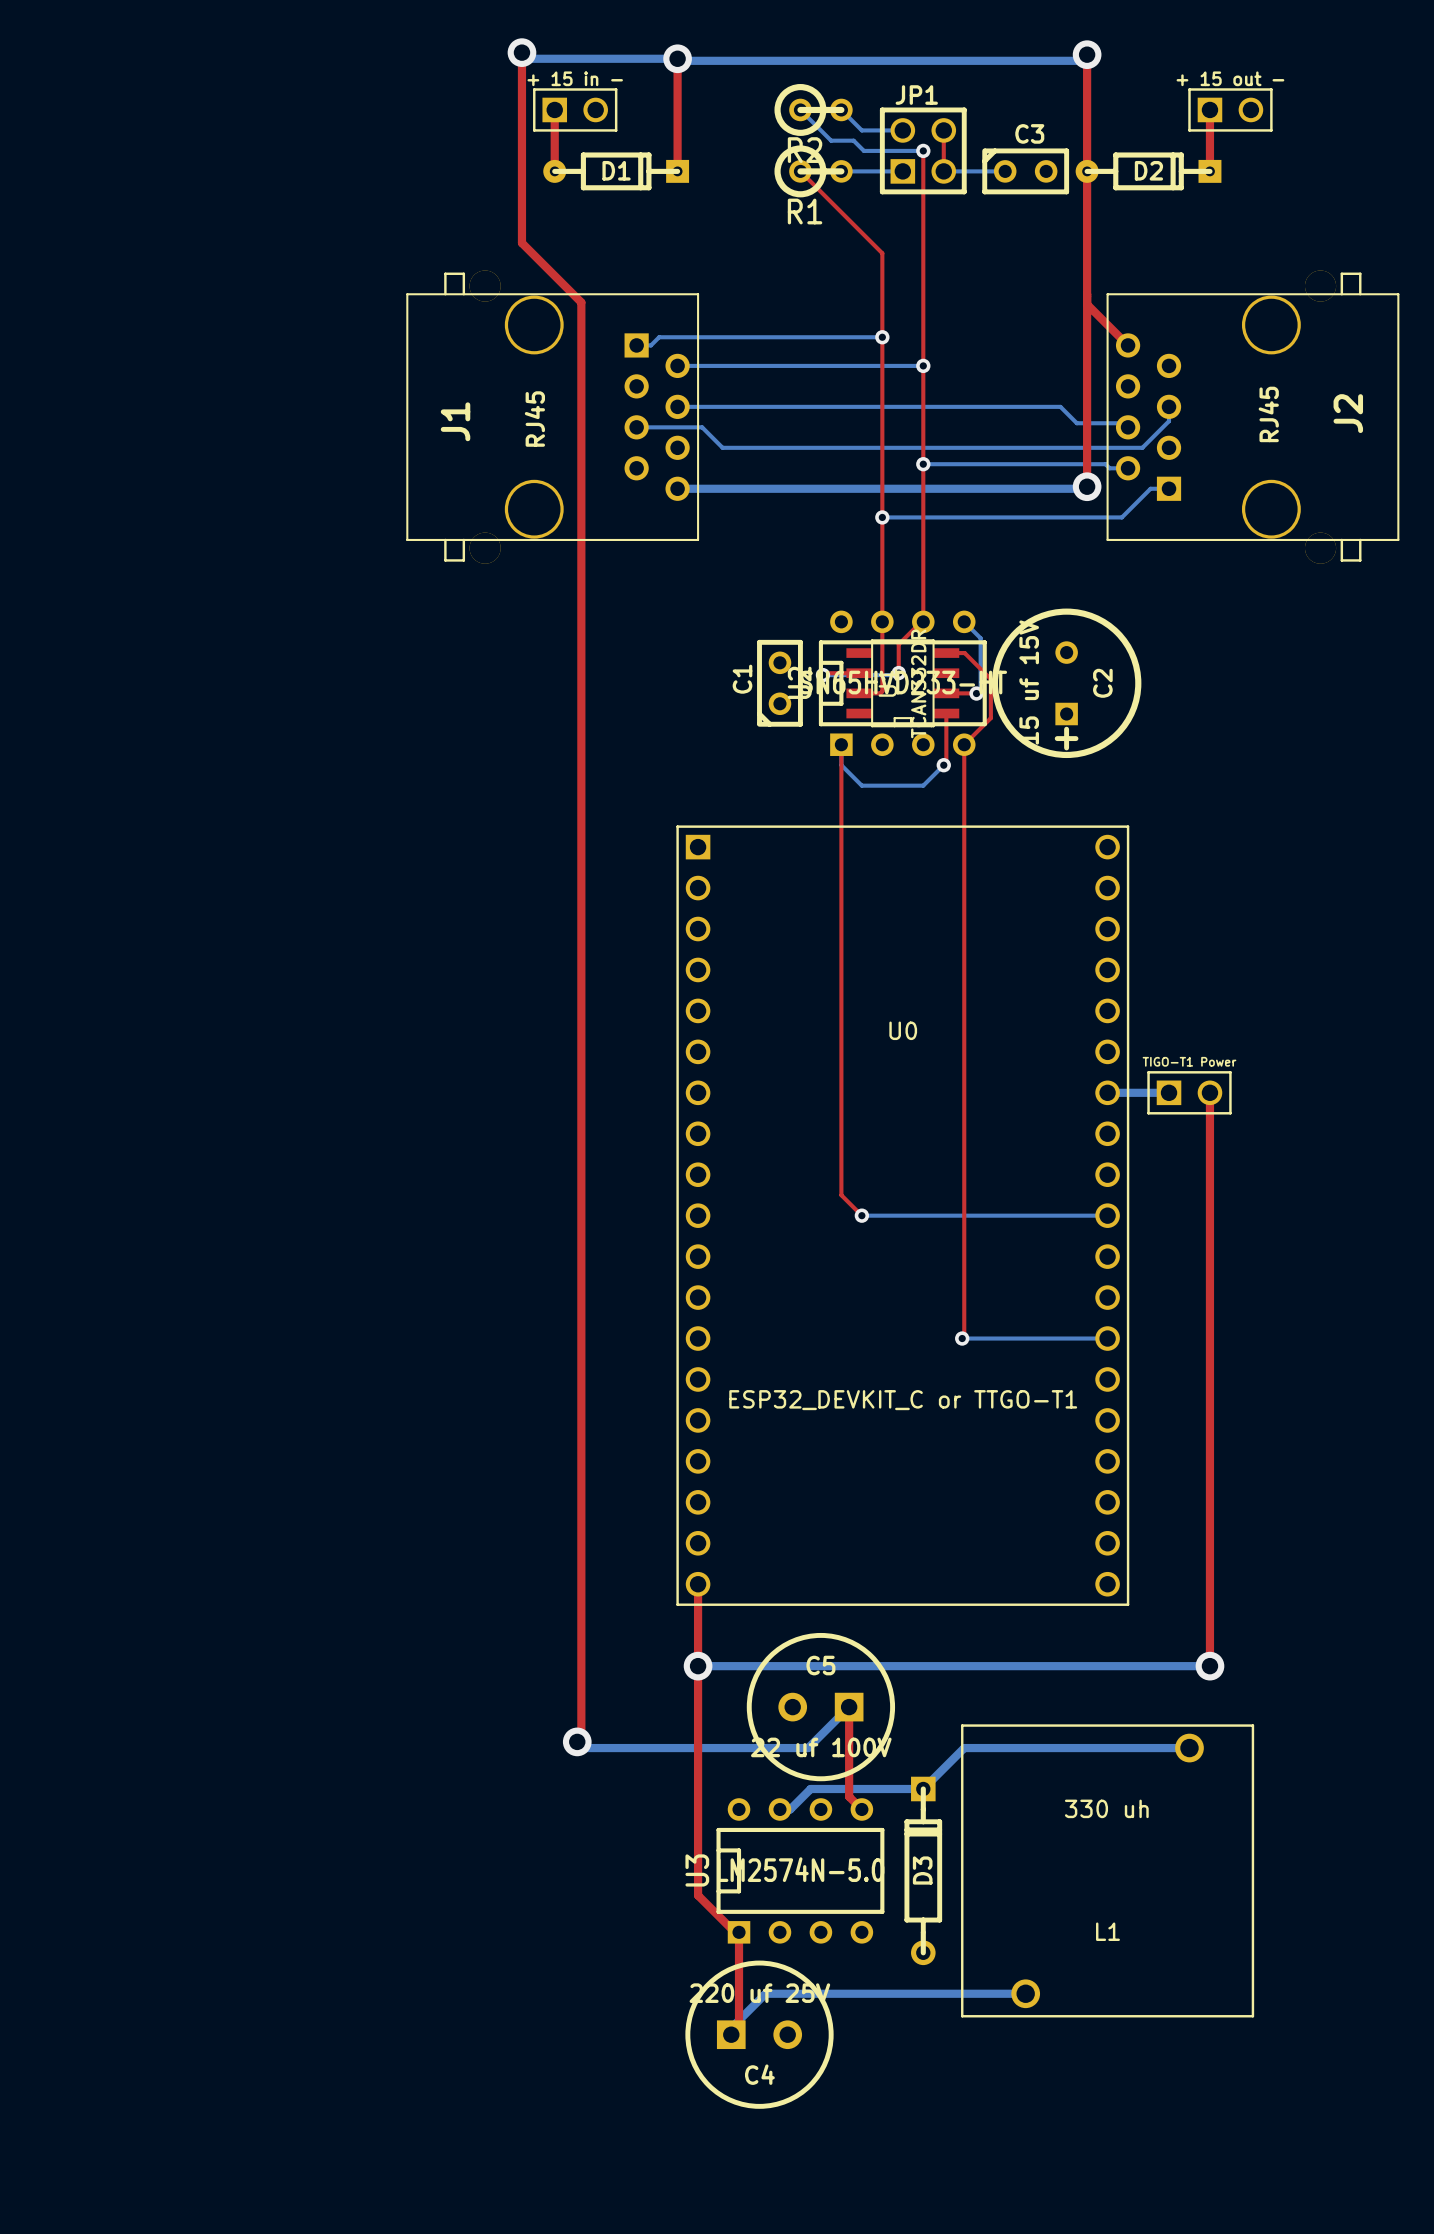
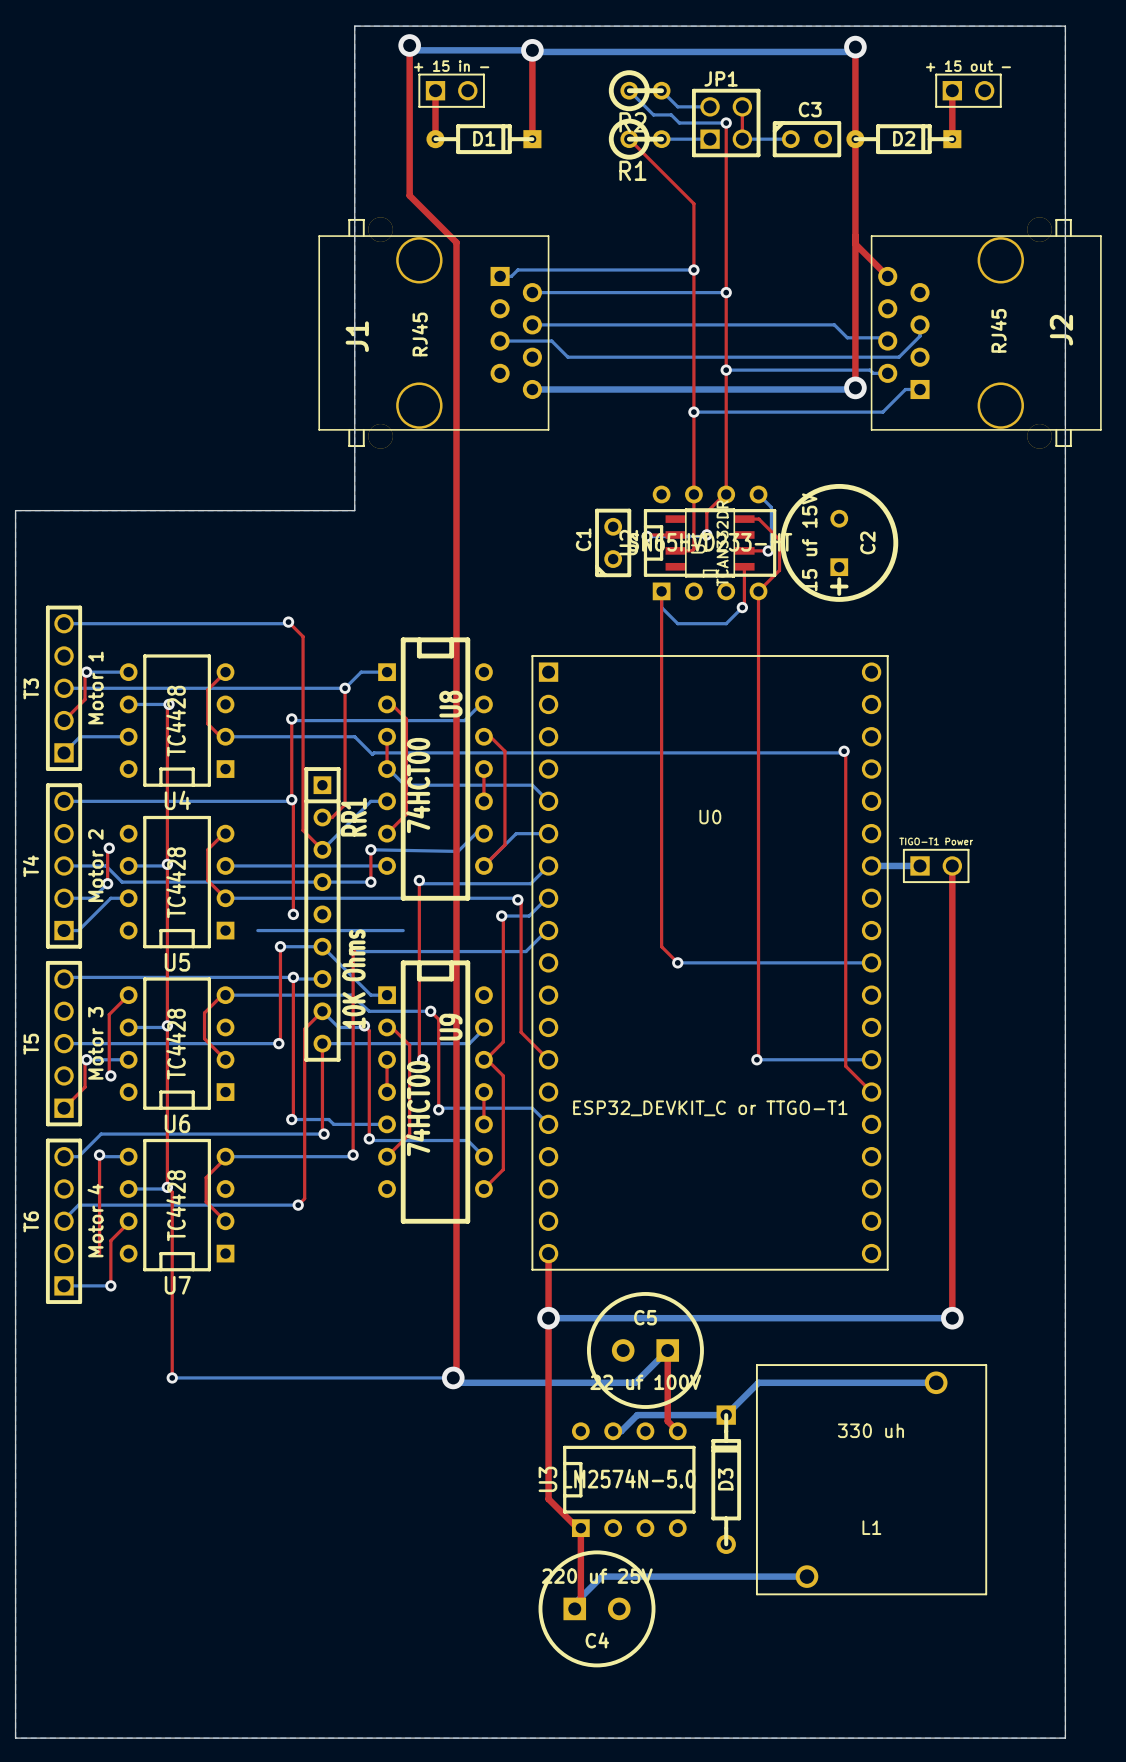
board edge: none -> (354, 26) (354, 510) (15, 510) (15, 1738) (1065, 1738) (1065, 26) (354, 26)
top track: none -> (288, 622) (303, 636) (303, 830) (322, 849)
bottom track: none -> (288, 622) (286, 623) (64, 623)
via: none -> (288, 622)
top track: none -> (86, 672) (85, 673) (85, 699) (64, 720)
bottom track: none -> (86, 672) (128, 672)
via: none -> (86, 672)
top track: none -> (225, 672) (207, 689) (207, 723) (220, 736) (225, 736)
bottom track: none -> (387, 672) (361, 672) (345, 688) (64, 688)
T3: none -> Motor 1 (64, 688)
top track: none -> (345, 688) (345, 804) (332, 817) (322, 817)
via: none -> (345, 688)
bottom track: none -> (128, 704) (169, 704)
top track: none -> (169, 704) (167, 706) (167, 1187) (172, 1192) (172, 1377)
via: none -> (169, 704)
top track: none -> (387, 704) (391, 704) (406, 718) (406, 814) (387, 833)
bottom track: none -> (483, 704) (480, 704) (464, 720) (293, 720) (291, 718)
top track: none -> (291, 718) (293, 914)
via: none -> (291, 718)
U4: none -> TC4428 (177, 720)
bottom track: none -> (128, 736) (80, 736) (64, 752)
bottom track: none -> (225, 736) (354, 736) (372, 754) (374, 752) (842, 752) (844, 751)
top track: none -> (387, 736) (387, 769)
top track: none -> (483, 736) (490, 736) (504, 751) (504, 844) (483, 865)
top track: none -> (844, 751) (845, 752) (845, 1066) (871, 1092)
via: none -> (844, 751)
bottom track: none -> (387, 769) (404, 785) (532, 785) (548, 801)
U8: none -> 74HCT00 (435, 769)
top track: none -> (483, 769) (483, 801)
bottom track: none -> (291, 799) (290, 801) (64, 801)
via: none -> (291, 799)
bottom track: none -> (387, 801) (370, 801) (322, 849)
top track: none -> (225, 833) (207, 849) (207, 880) (225, 898)
bottom track: none -> (483, 833) (475, 833) (458, 851) (369, 849)
bottom track: none -> (548, 833) (516, 833) (483, 865)
top track: none -> (109, 848) (107, 849) (107, 883)
via: none -> (109, 848)
top track: none -> (370, 849) (370, 882)
via: none -> (370, 849)
bottom track: none -> (167, 864) (165, 865) (128, 865)
via: none -> (167, 864)
bottom track: none -> (64, 865) (106, 865) (122, 882) (370, 882)
T4: none -> Motor 2 (64, 865)
bottom track: none -> (225, 865) (387, 865)
bottom track: none -> (548, 865) (530, 883) (422, 883) (419, 880)
top track: none -> (419, 880) (419, 1056) (422, 1059)
via: none -> (419, 880)
U5: none -> TC4428 (177, 882)
via: none -> (370, 882)
bottom track: none -> (107, 883) (93, 898) (64, 898)
via: none -> (107, 883)
bottom track: none -> (128, 898) (110, 898) (78, 930) (64, 930)
bottom track: none -> (225, 898) (516, 898) (517, 899)
bottom track: none -> (548, 898) (529, 916) (501, 916)
top track: none -> (517, 899) (521, 903) (521, 1032) (548, 1059)
via: none -> (517, 899)
via: none -> (293, 914)
RR1: none -> 10K Ohms (322, 914)
top track: none -> (501, 916) (503, 917) (503, 1042) (485, 1059)
via: none -> (501, 916)
bottom track: none -> (257, 930) (403, 930)
bottom track: none -> (548, 930) (525, 951) (354, 951)
top track: none -> (280, 946) (280, 1042) (278, 1043)
bottom track: none -> (280, 946) (322, 946) (370, 995) (387, 995)
via: none -> (280, 946)
top track: none -> (354, 951) (353, 953) (353, 1155)
top track: none -> (293, 977) (293, 1117) (291, 1119)
via: none -> (293, 977)
bottom track: none -> (64, 979) (65, 977) (322, 979)
top track: none -> (128, 995) (109, 1014) (109, 1074) (110, 1075)
top track: none -> (225, 995) (222, 995) (204, 1012) (204, 1038) (225, 1059)
bottom track: none -> (225, 995) (351, 995) (369, 1011) (430, 1011)
top track: none -> (322, 1011) (304, 1029) (304, 1198) (298, 1205)
bottom track: none -> (322, 1011) (338, 1027) (362, 1027) (364, 1025)
top track: none -> (430, 1011) (438, 1019) (438, 1109)
via: none -> (430, 1011)
bottom track: none -> (167, 1025) (165, 1027) (128, 1027)
via: none -> (167, 1025)
top track: none -> (364, 1025) (369, 1030) (369, 1138)
via: none -> (364, 1025)
top track: none -> (387, 1027) (391, 1027) (409, 1045) (409, 1134) (387, 1156)
bottom track: none -> (483, 1027) (469, 1043) (322, 1043)
bottom track: none -> (64, 1043) (278, 1043)
T5: none -> Motor 3 (64, 1043)
U6: none -> TC4428 (177, 1043)
via: none -> (278, 1043)
top track: none -> (322, 1043) (322, 1132) (324, 1134)
top track: none -> (86, 1059) (85, 1061) (85, 1087) (64, 1108)
bottom track: none -> (86, 1059) (128, 1059)
via: none -> (86, 1059)
top track: none -> (387, 1059) (387, 1092)
via: none -> (422, 1059)
top track: none -> (483, 1059) (487, 1059) (503, 1075) (503, 1169) (483, 1188)
via: none -> (110, 1075)
U9: none -> 74HCT00 (435, 1092)
top track: none -> (483, 1092) (483, 1124)
bottom track: none -> (438, 1109) (440, 1108) (532, 1108) (548, 1124)
via: none -> (438, 1109)
bottom track: none -> (291, 1119) (328, 1119) (333, 1124) (387, 1124)
via: none -> (291, 1119)
bottom track: none -> (324, 1134) (101, 1134) (78, 1156) (64, 1156)
via: none -> (324, 1134)
bottom track: none -> (369, 1138) (370, 1140) (467, 1140) (483, 1156)
via: none -> (369, 1138)
top track: none -> (99, 1155) (99, 1253)
bottom track: none -> (99, 1155) (101, 1156) (128, 1156)
via: none -> (99, 1155)
bottom track: none -> (353, 1155) (351, 1156) (225, 1156)
via: none -> (353, 1155)
top track: none -> (225, 1156) (206, 1177) (206, 1201) (225, 1221)
bottom track: none -> (167, 1187) (128, 1188)
via: none -> (167, 1187)
U7: none -> TC4428 (177, 1205)
bottom track: none -> (298, 1205) (78, 1205) (64, 1221)
via: none -> (298, 1205)
T6: none -> Motor 4 (64, 1221)
top track: none -> (128, 1221) (110, 1240) (110, 1285)
bottom track: none -> (64, 1285) (110, 1285)
via: none -> (110, 1285)
bottom track: none -> (172, 1377) (453, 1377)
via: none -> (172, 1377)

